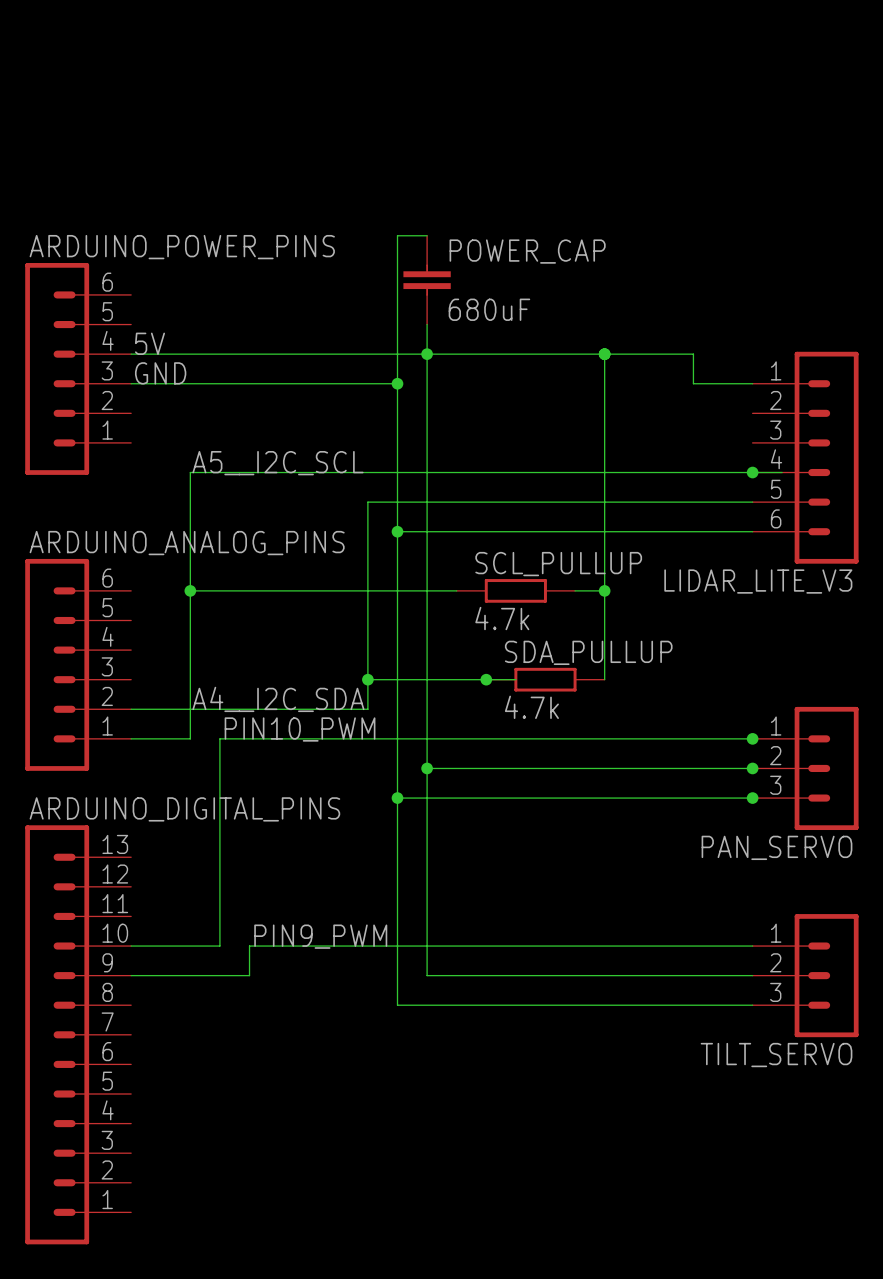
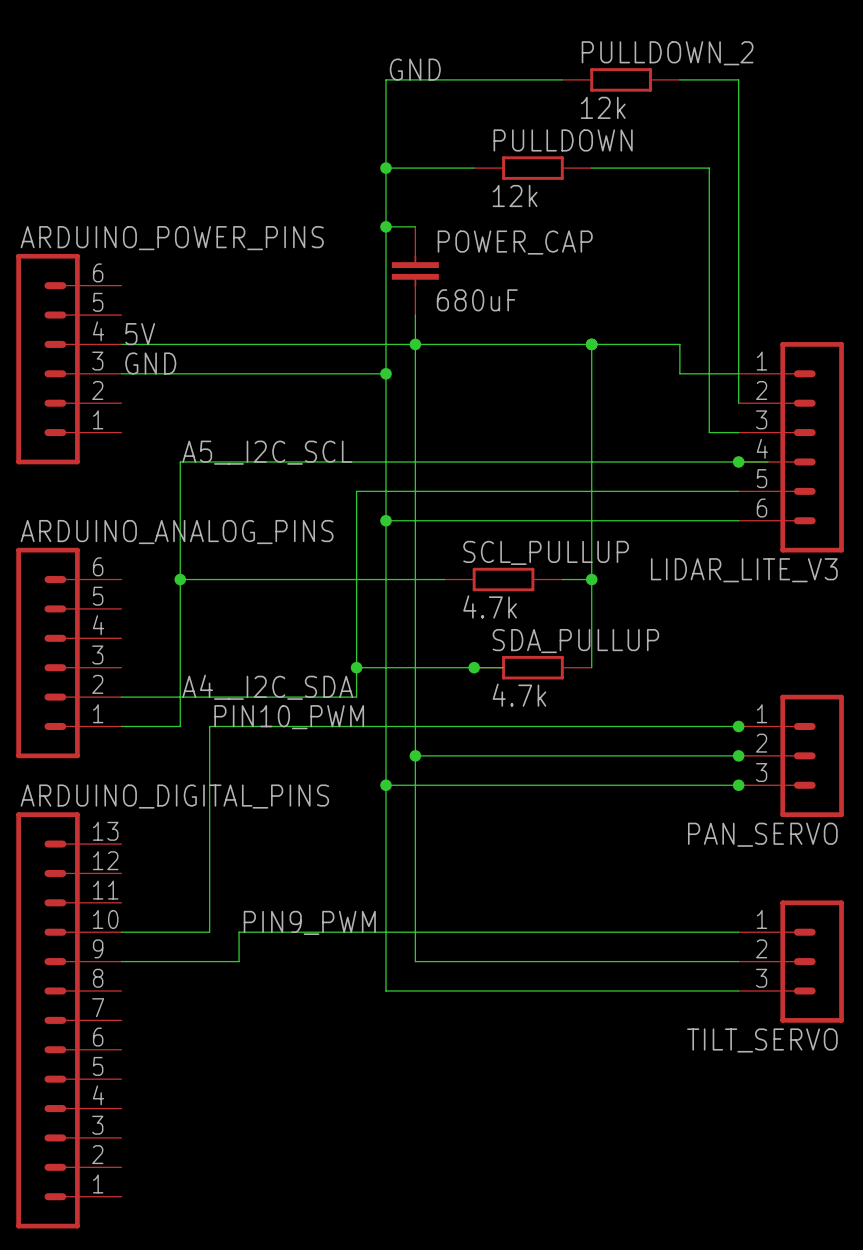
label: none -> GND (415, 69)
wire: none -> (562, 79) (385, 79) (385, 226)
PULLDOWN_2: none -> 12k (621, 79)
wire: none -> (679, 79) (738, 79) (738, 403)
wire: none -> (385, 168) (474, 168)
junction: none -> (385, 168)
PULLDOWN: none -> 12k (532, 168)
wire: none -> (591, 168) (709, 168) (709, 432) (738, 432)
junction: none -> (385, 226)

